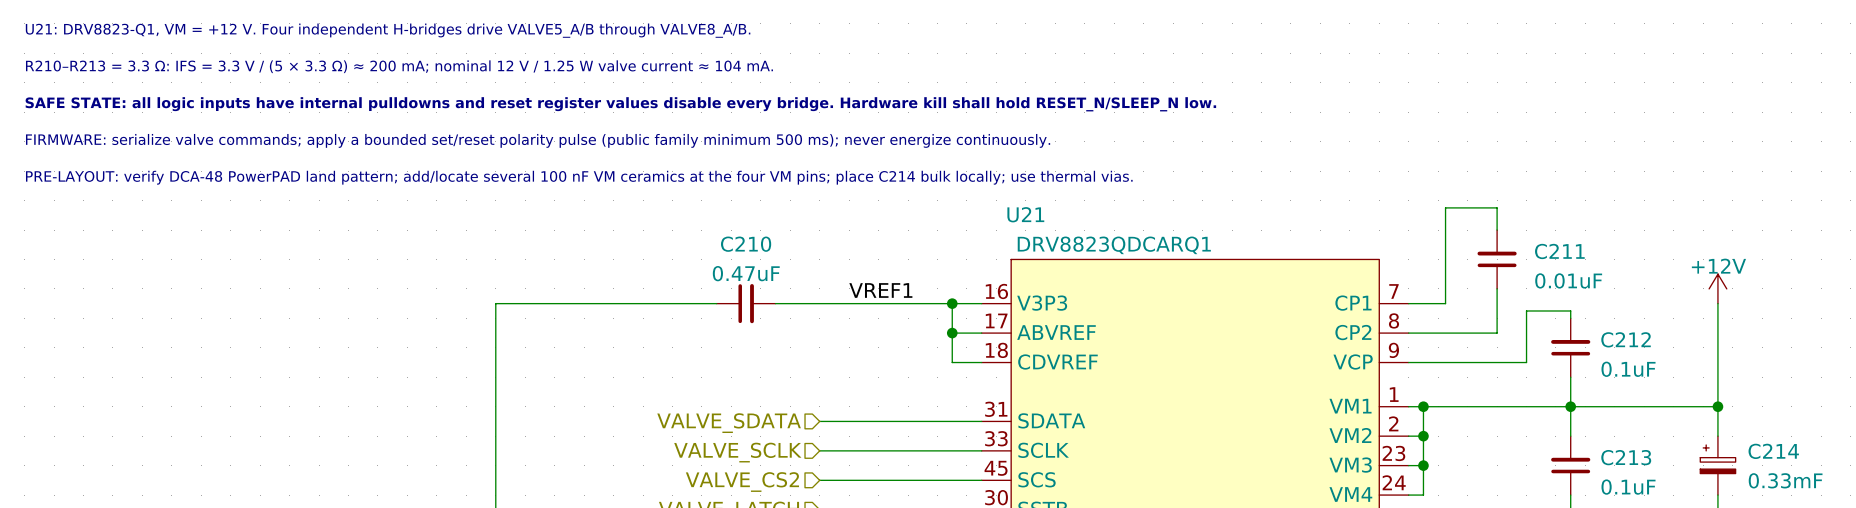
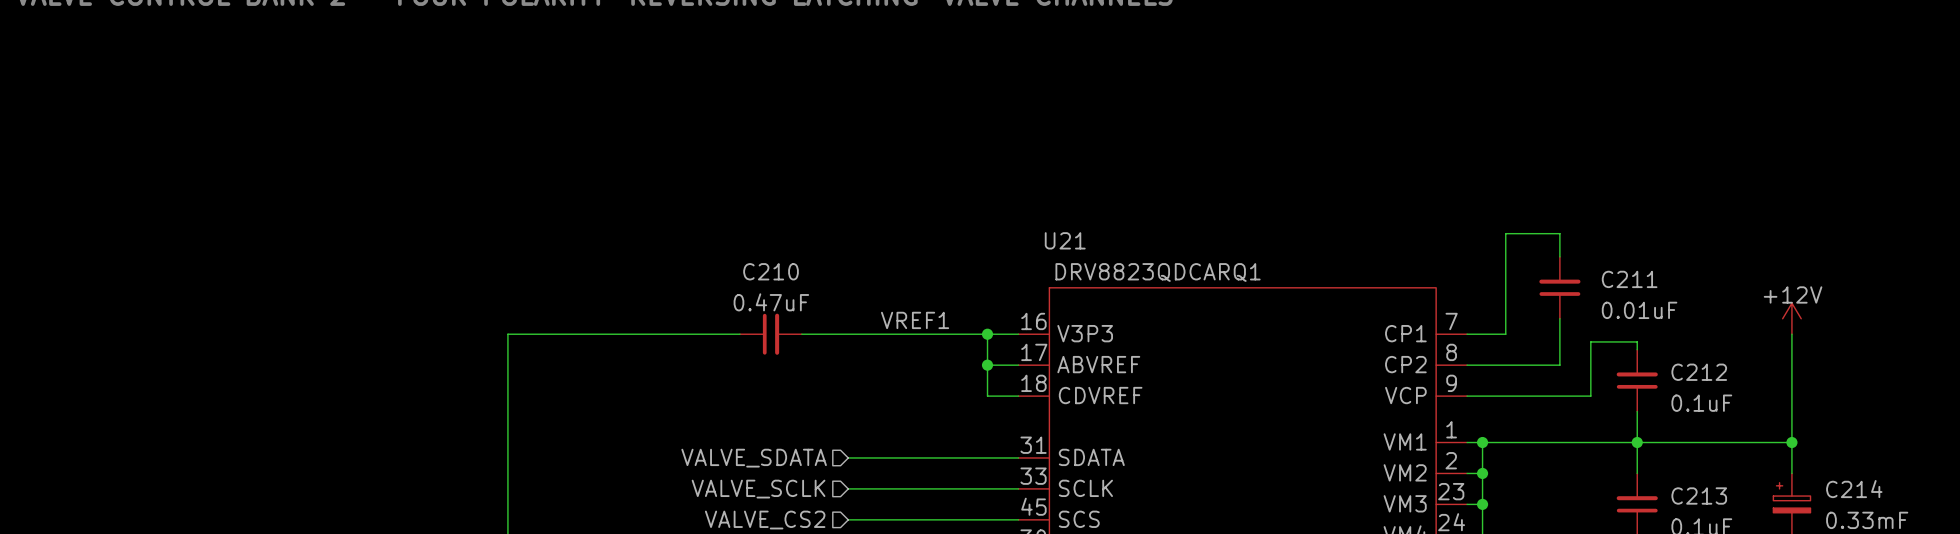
text: U21: DRV8823-Q1, VM = +12 V. Four independent H-bridges drive VALVE5_A/B through VALVE8_A/B. (388, 30) -> none
text: R210–R213 = 3.3 Ω: IFS = 3.3 V / (5 × 3.3 Ω) ≈ 200 mA; nominal 12 V / 1.25 W valve current ≈ 104 mA. (399, 66) -> none
text: SAFE STATE: all logic inputs have internal pulldowns and reset register values disable every bridge. Hardware kill shall hold RESET_N/SLEEP_N low. (620, 104) -> none
text: FIRMWARE: serialize valve commands; apply a bounded set/reset polarity pulse (public family minimum 500 ms); never energize continuously. (538, 140) -> none
text: PRE-LAYOUT: verify DCA-48 PowerPAD land pattern; add/locate several 100 nF VM ceramics at the four VM pins; place C214 bulk locally; use thermal vias. (579, 177) -> none

